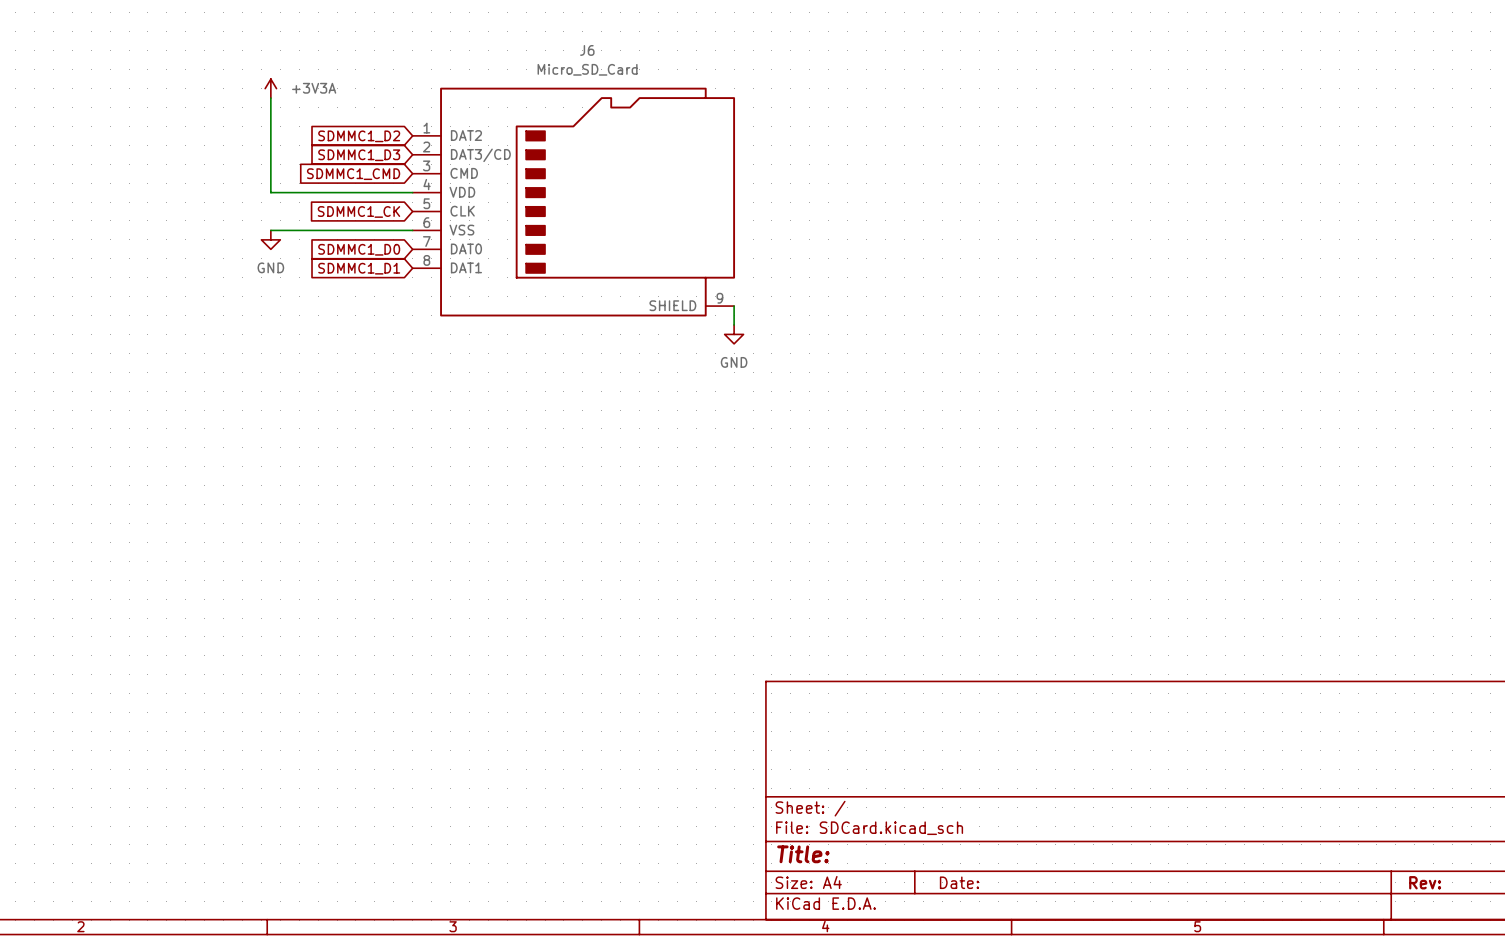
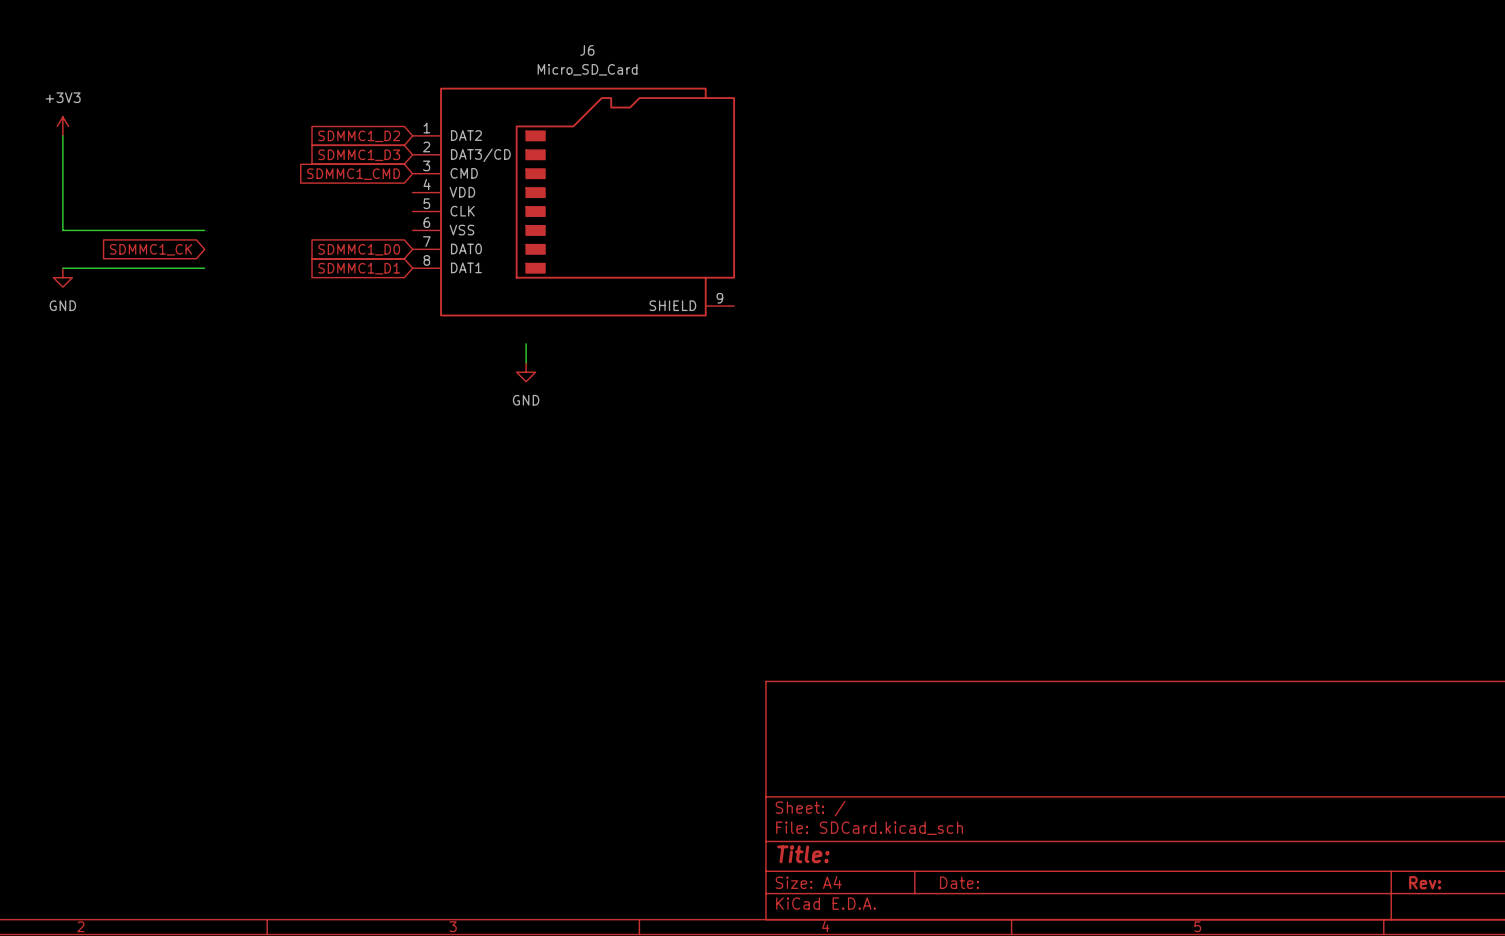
power symbol: +3V3A (270, 88) -> none
wire: (270, 98) (270, 192) (412, 192) -> none
power symbol: none -> +3V3 (62, 126)
wire: none -> (62, 135) (62, 230) (204, 230)
global label: SDMMC1_CK (358, 211) -> none
wire: (270, 230) (412, 230) -> none
power symbol: GND (270, 239) -> none
global label: none -> SDMMC1_CK (150, 249)
wire: none -> (62, 268) (204, 268)
power symbol: none -> GND (62, 277)
wire: (734, 306) (734, 324) -> none
power symbol: GND (734, 334) -> none
wire: none -> (526, 343) (526, 362)
power symbol: none -> GND (526, 372)

